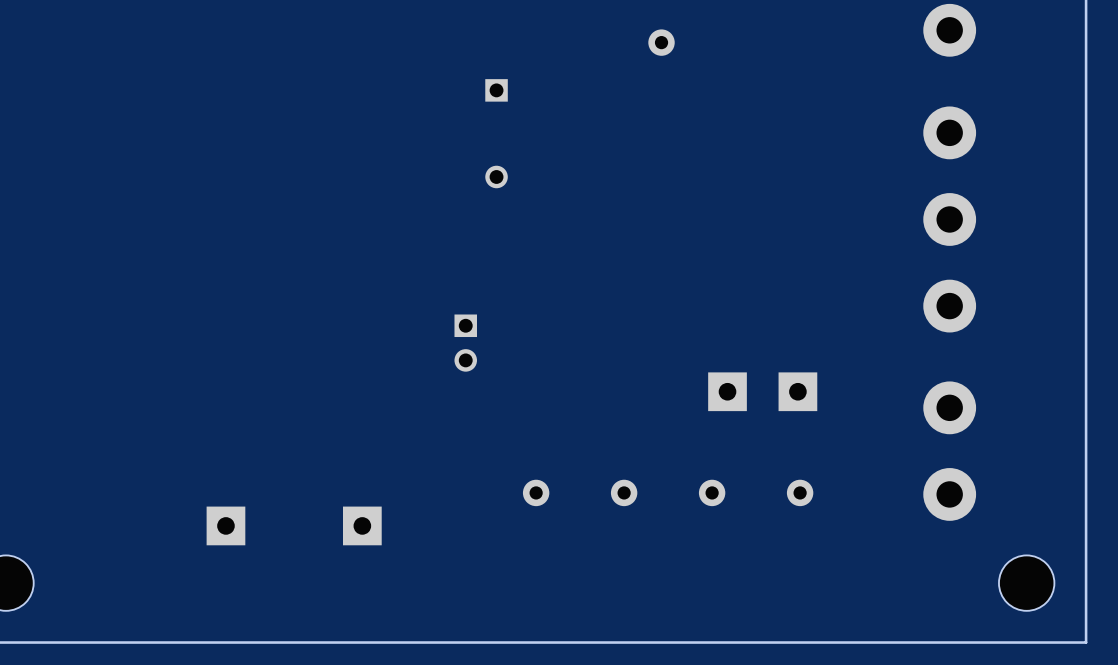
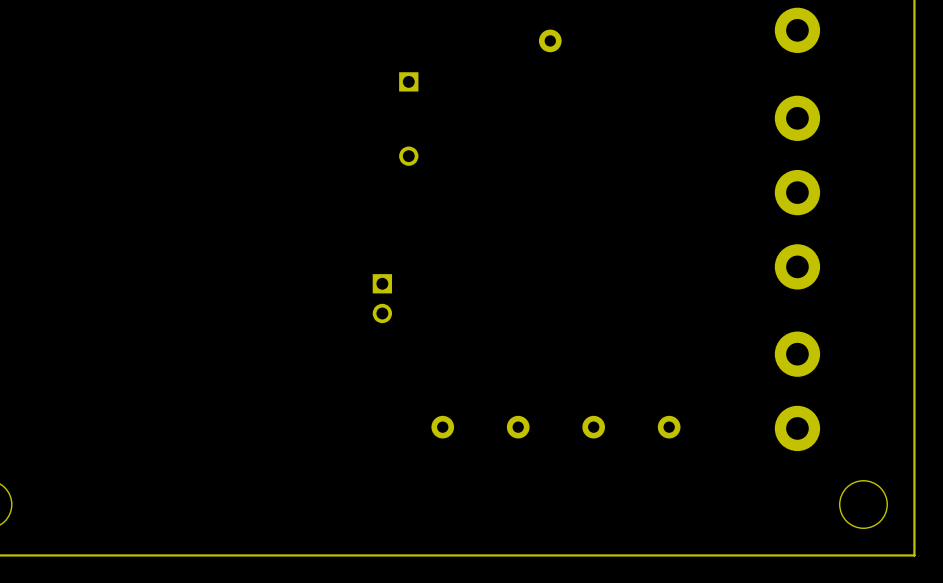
part: (727, 391) -> none
part: (797, 391) -> none
part: (225, 525) -> none
part: (362, 525) -> none

